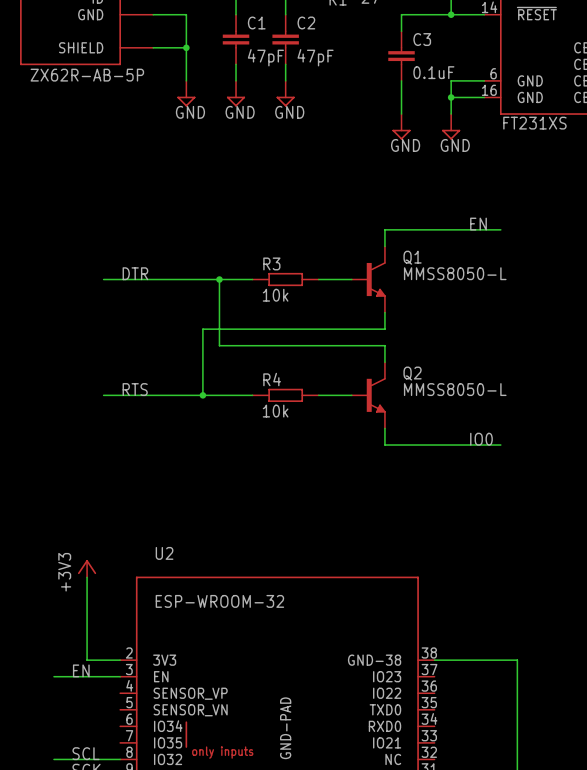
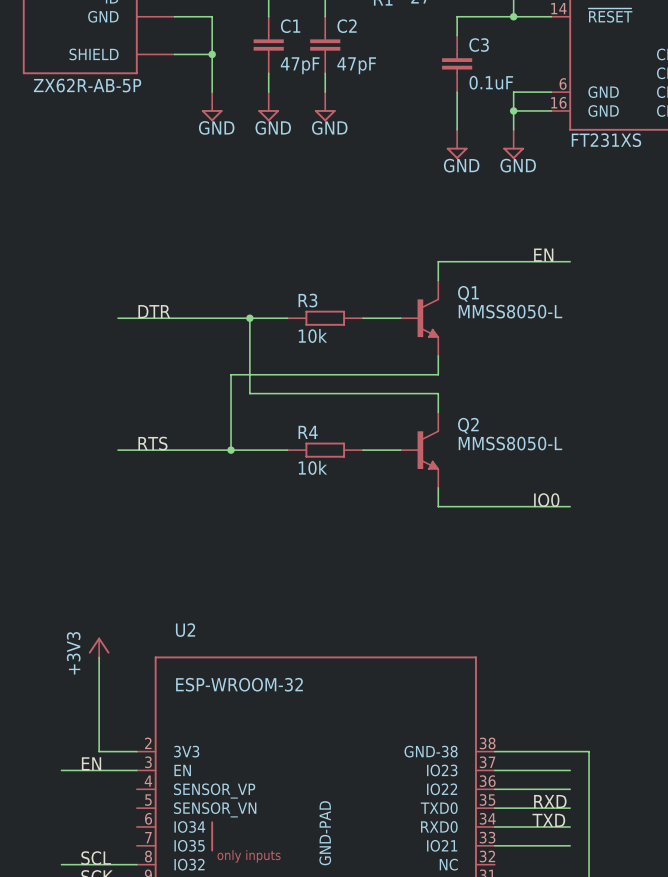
wire: none -> (494, 770) (570, 770)
wire: none -> (494, 789) (570, 789)
label: none -> RXD (550, 801)
wire: none -> (494, 808) (570, 808)
label: none -> TXD (548, 820)
wire: none -> (494, 826) (570, 826)
wire: none -> (494, 845) (570, 845)

